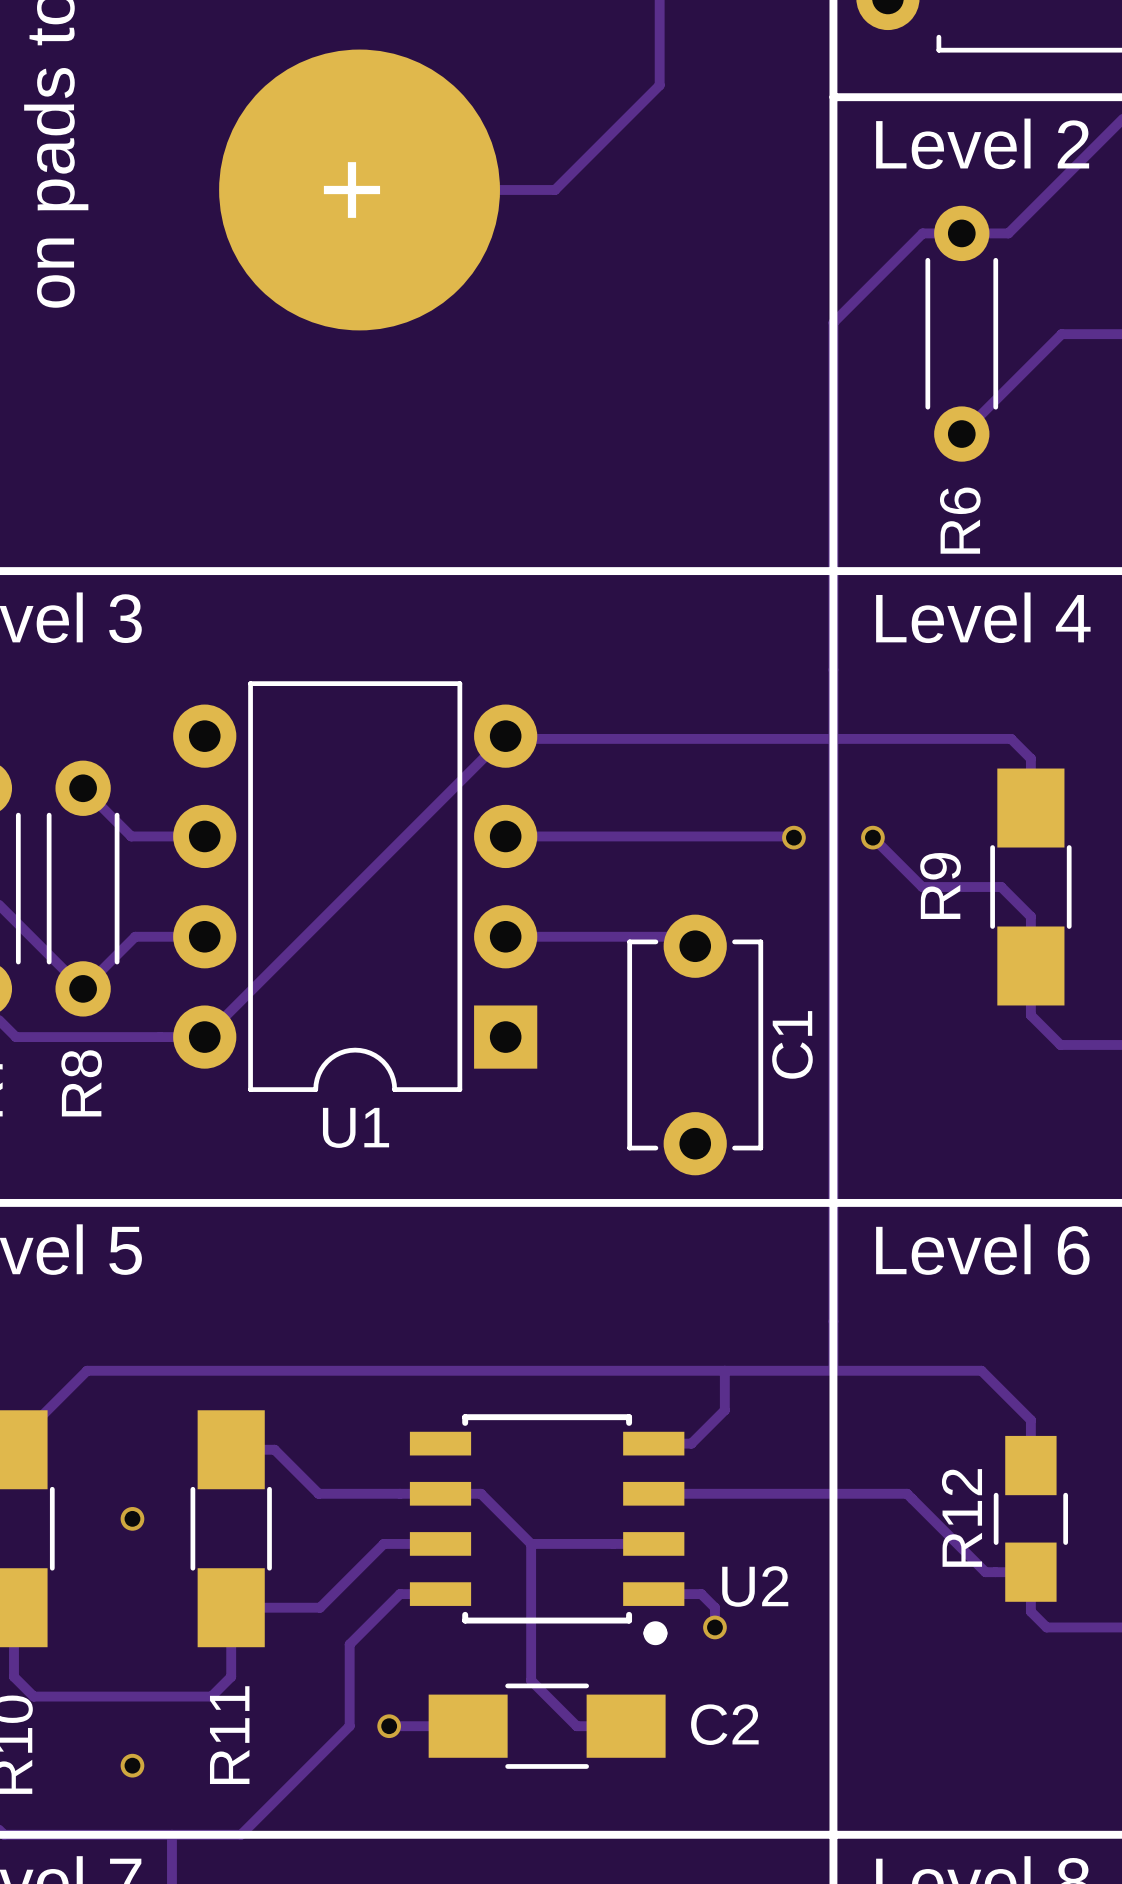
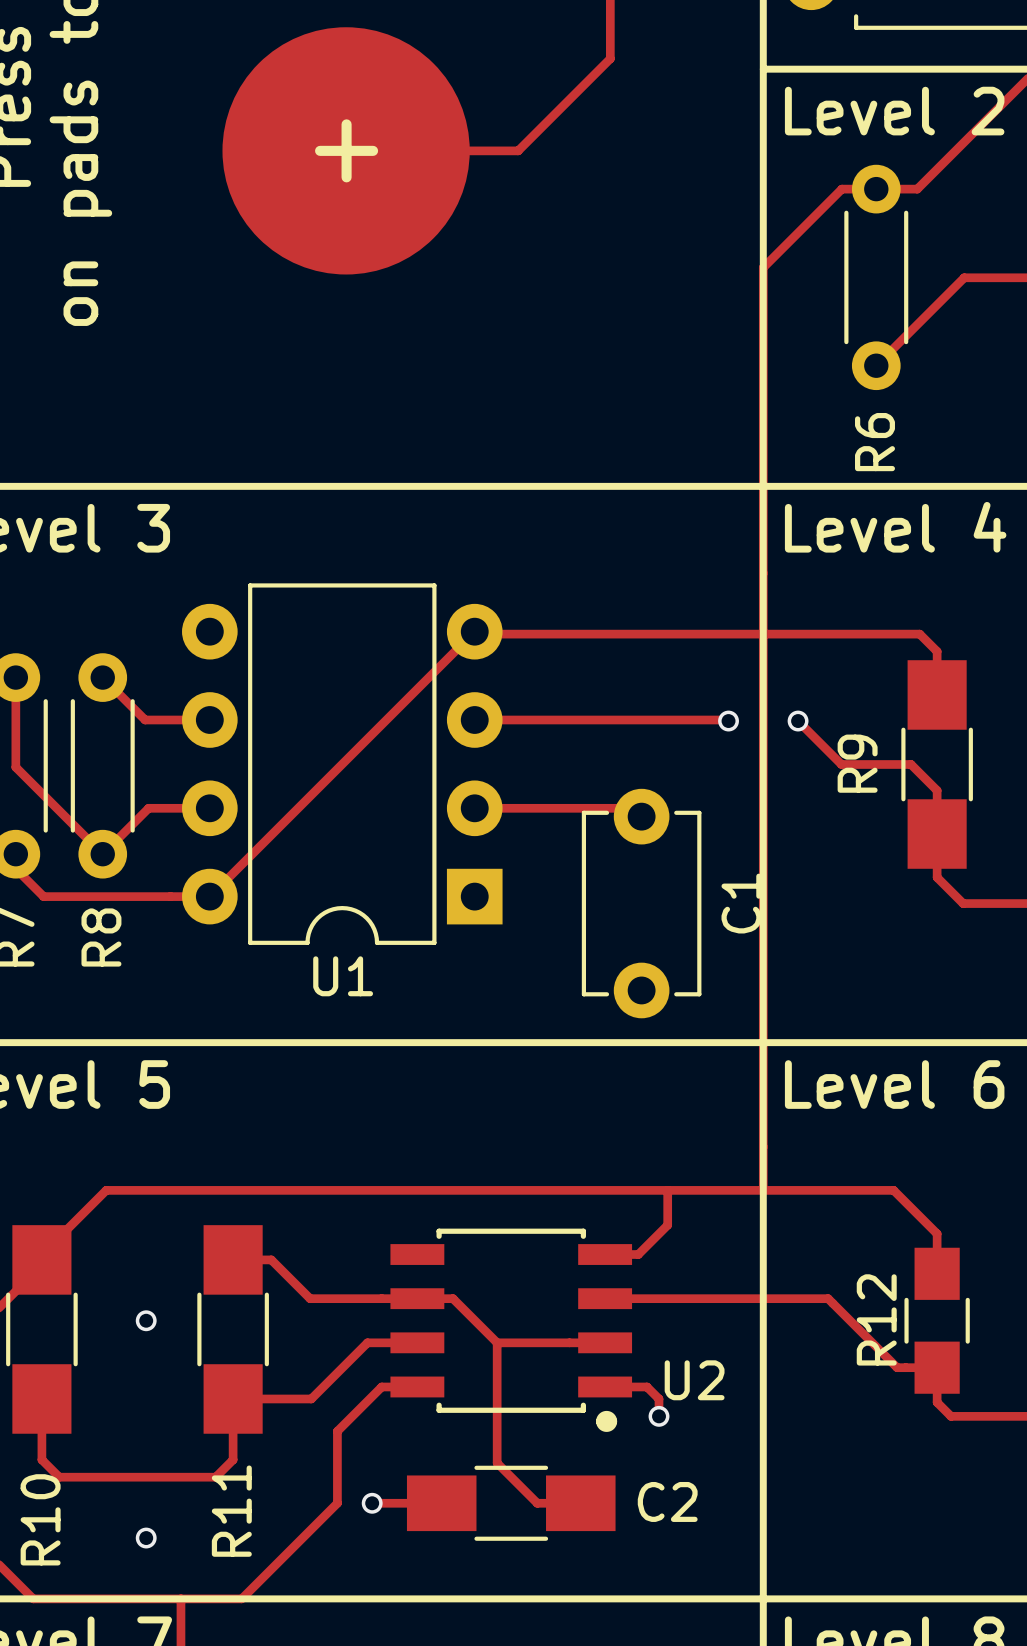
C1 name position: C1 (792, 1044) -> C1 (741, 903)

